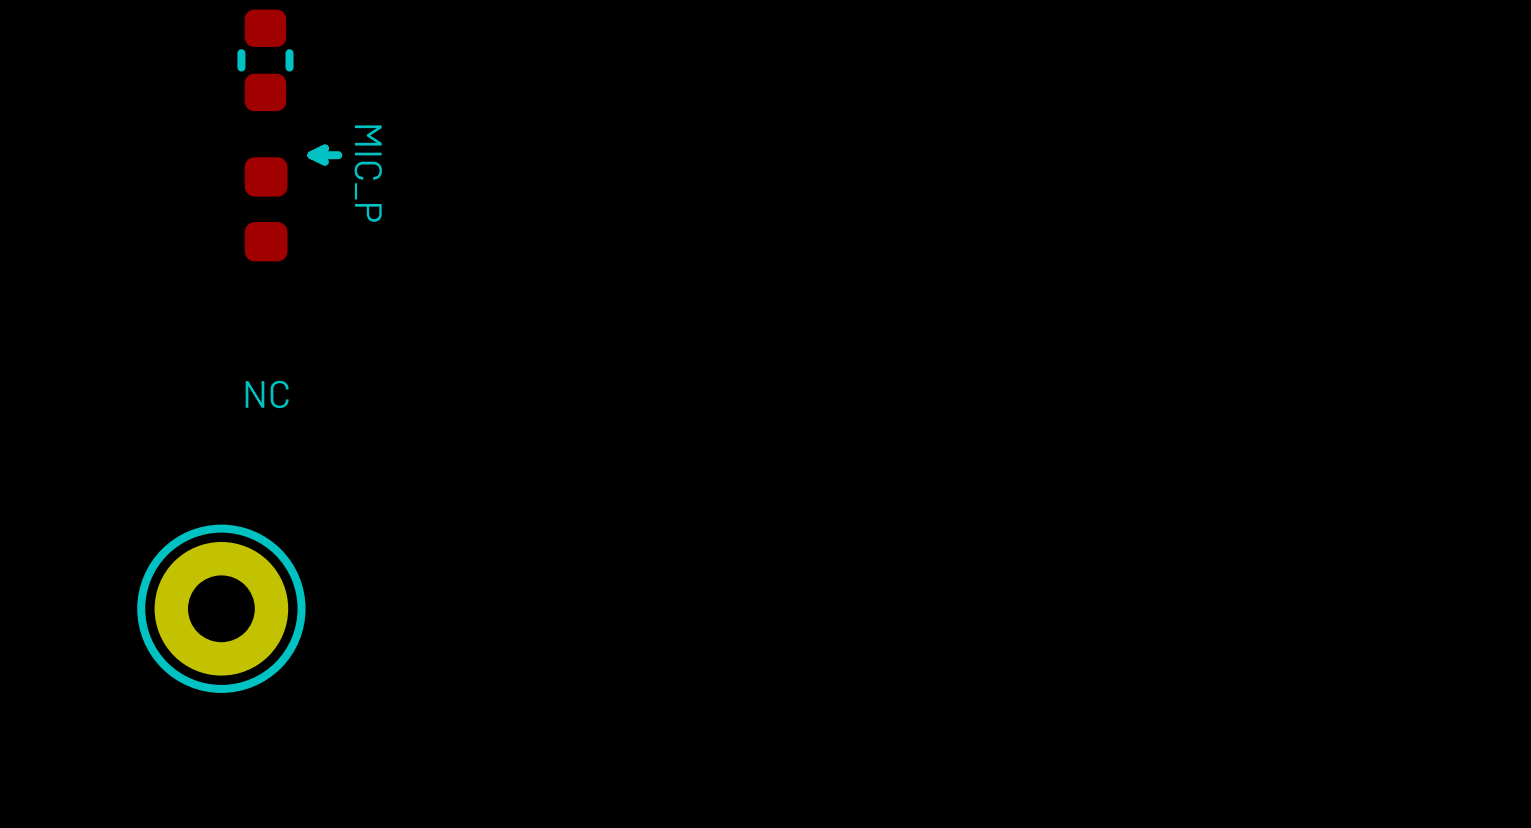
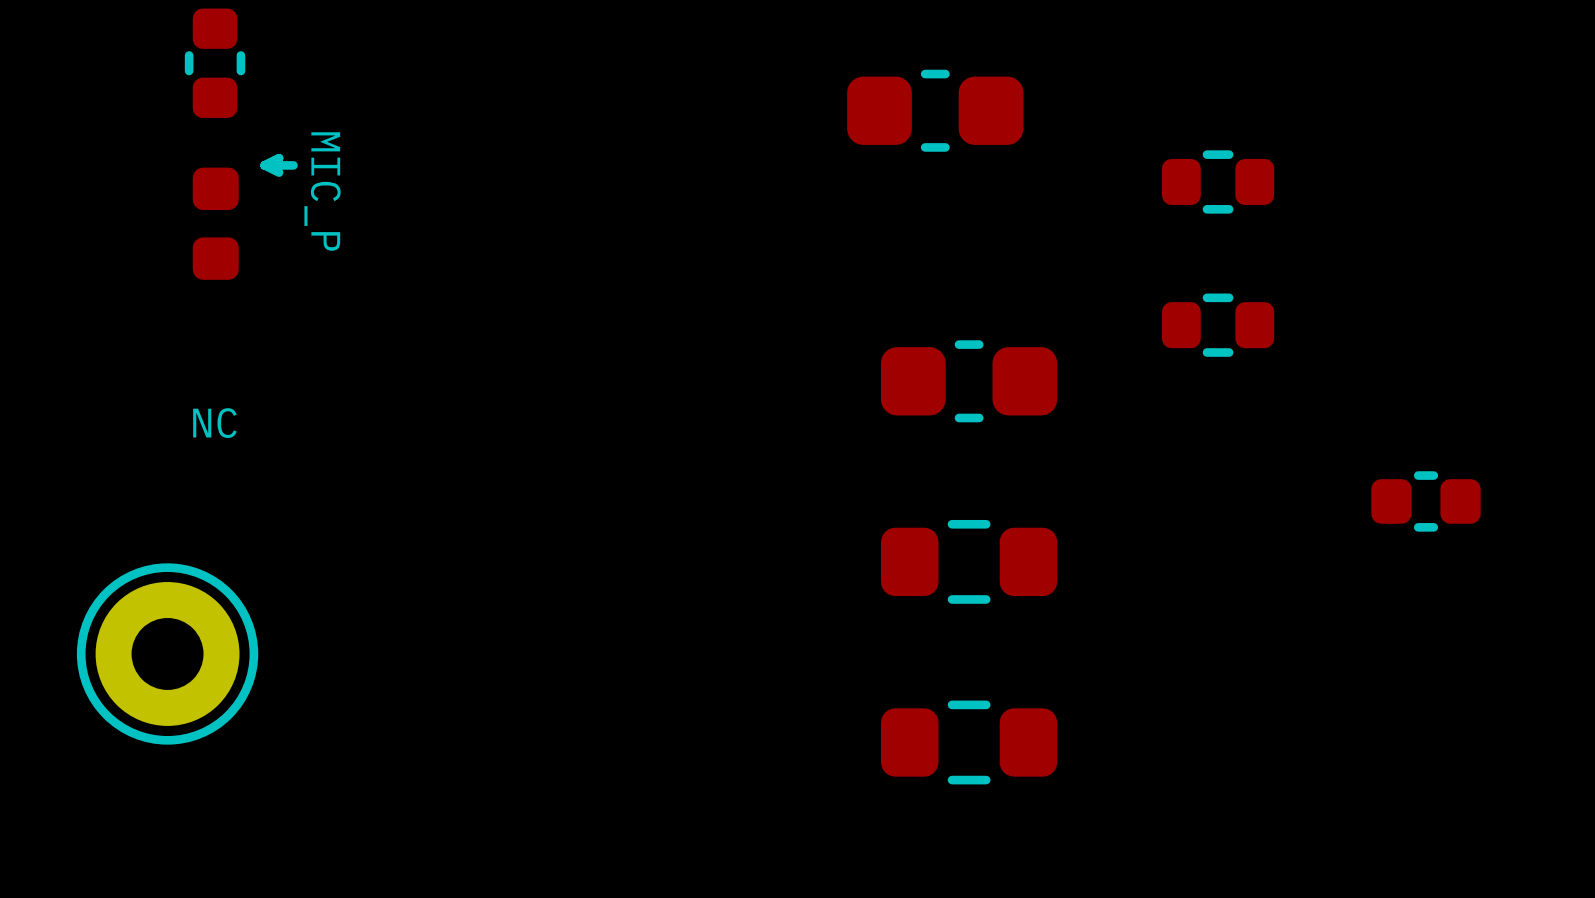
part: none -> (935, 110)
part: none -> (1218, 181)
part: none -> (1218, 325)
part: none -> (969, 381)
part: none -> (1425, 501)
part: none -> (969, 561)
part: none -> (969, 742)

